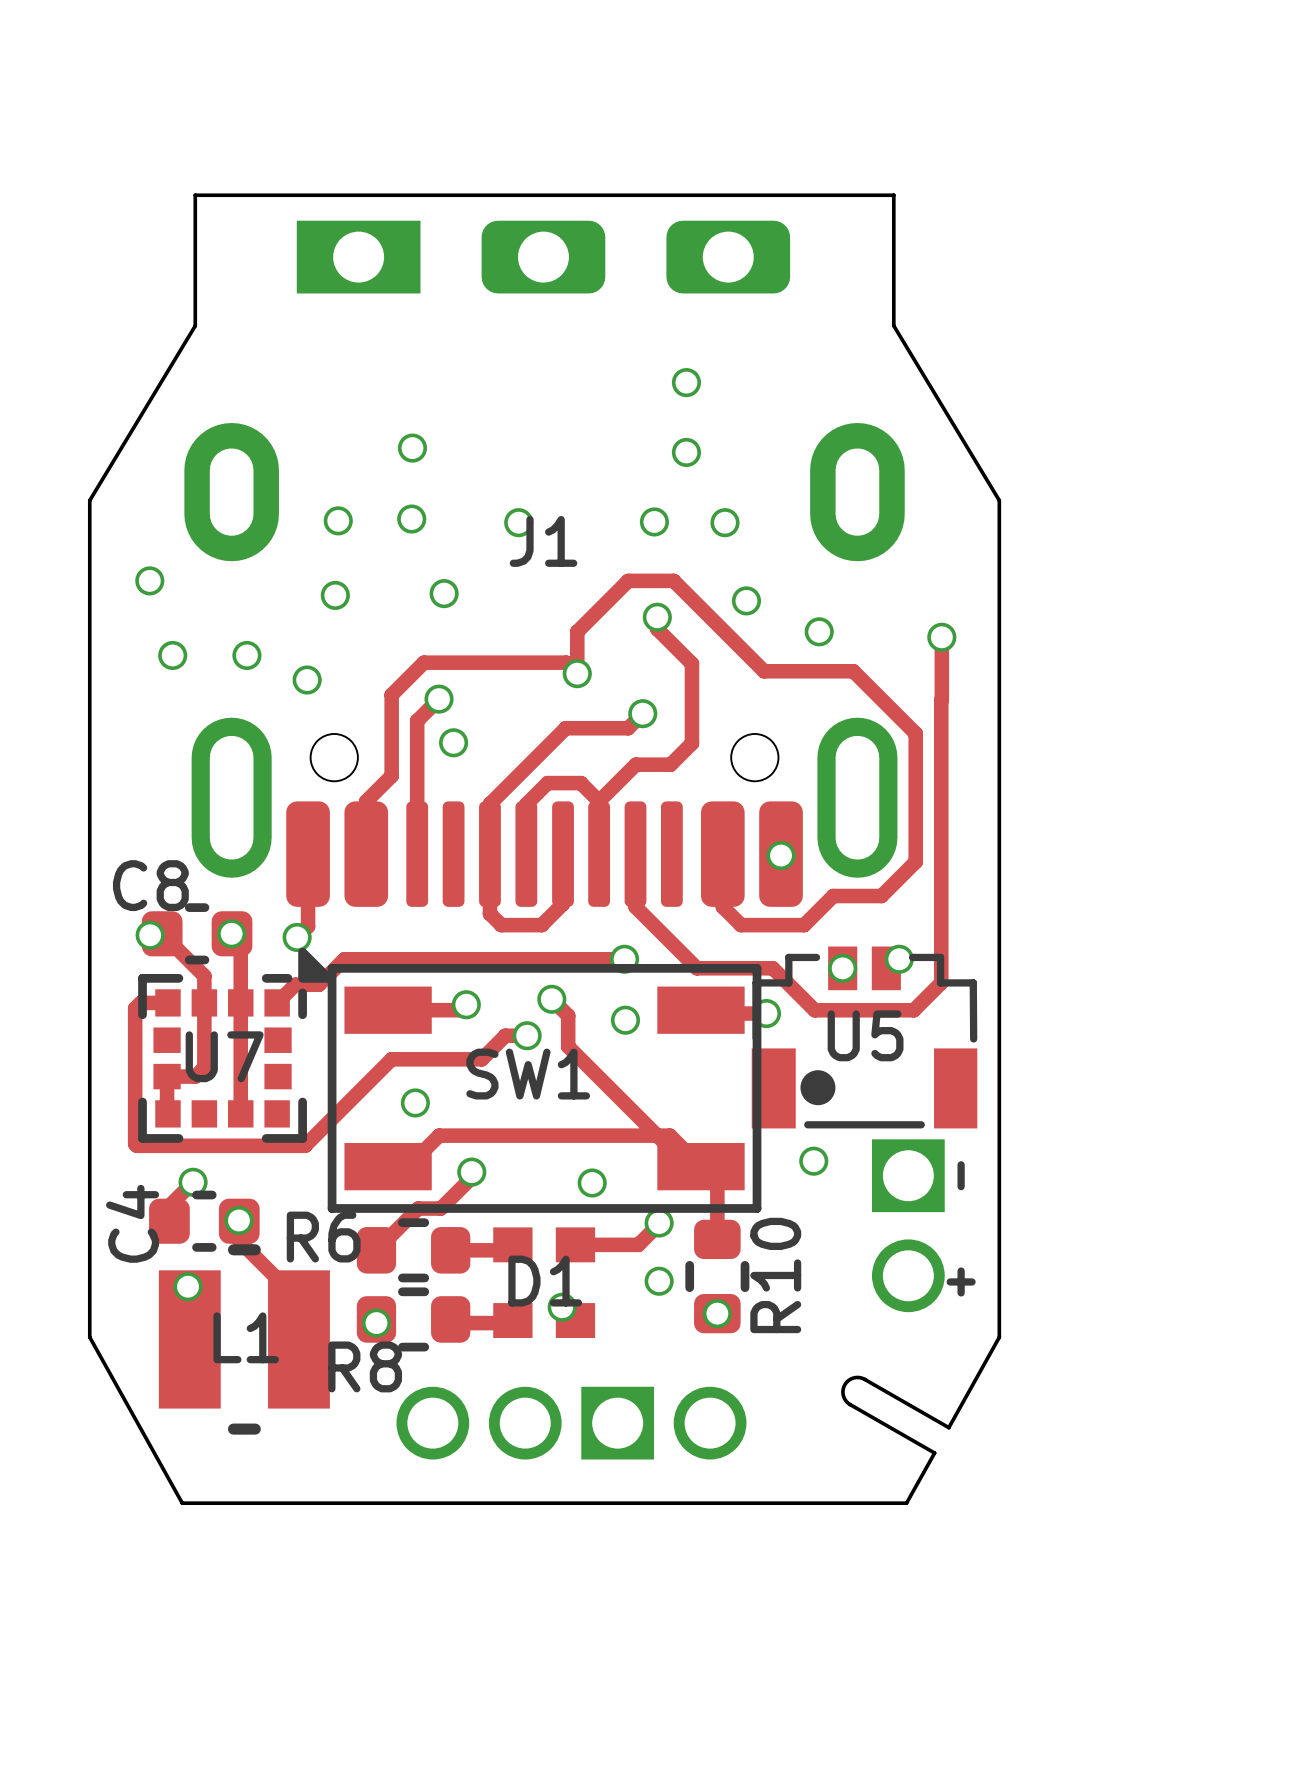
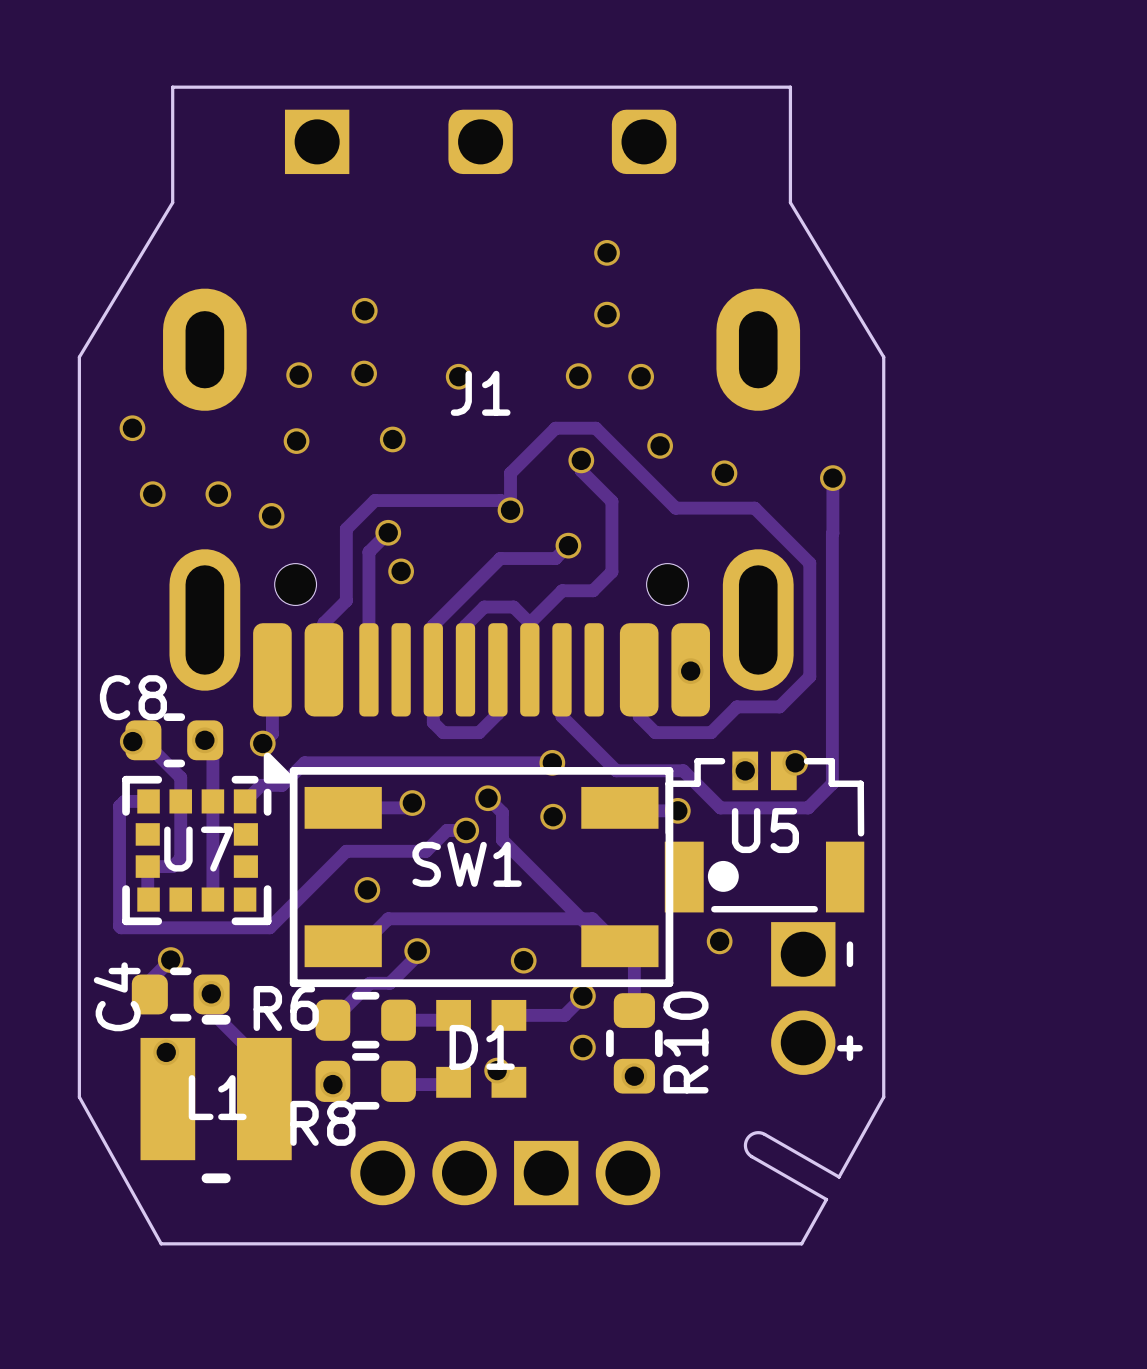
part footprint: [296, 220, 791, 294] -> [284, 109, 677, 175]

